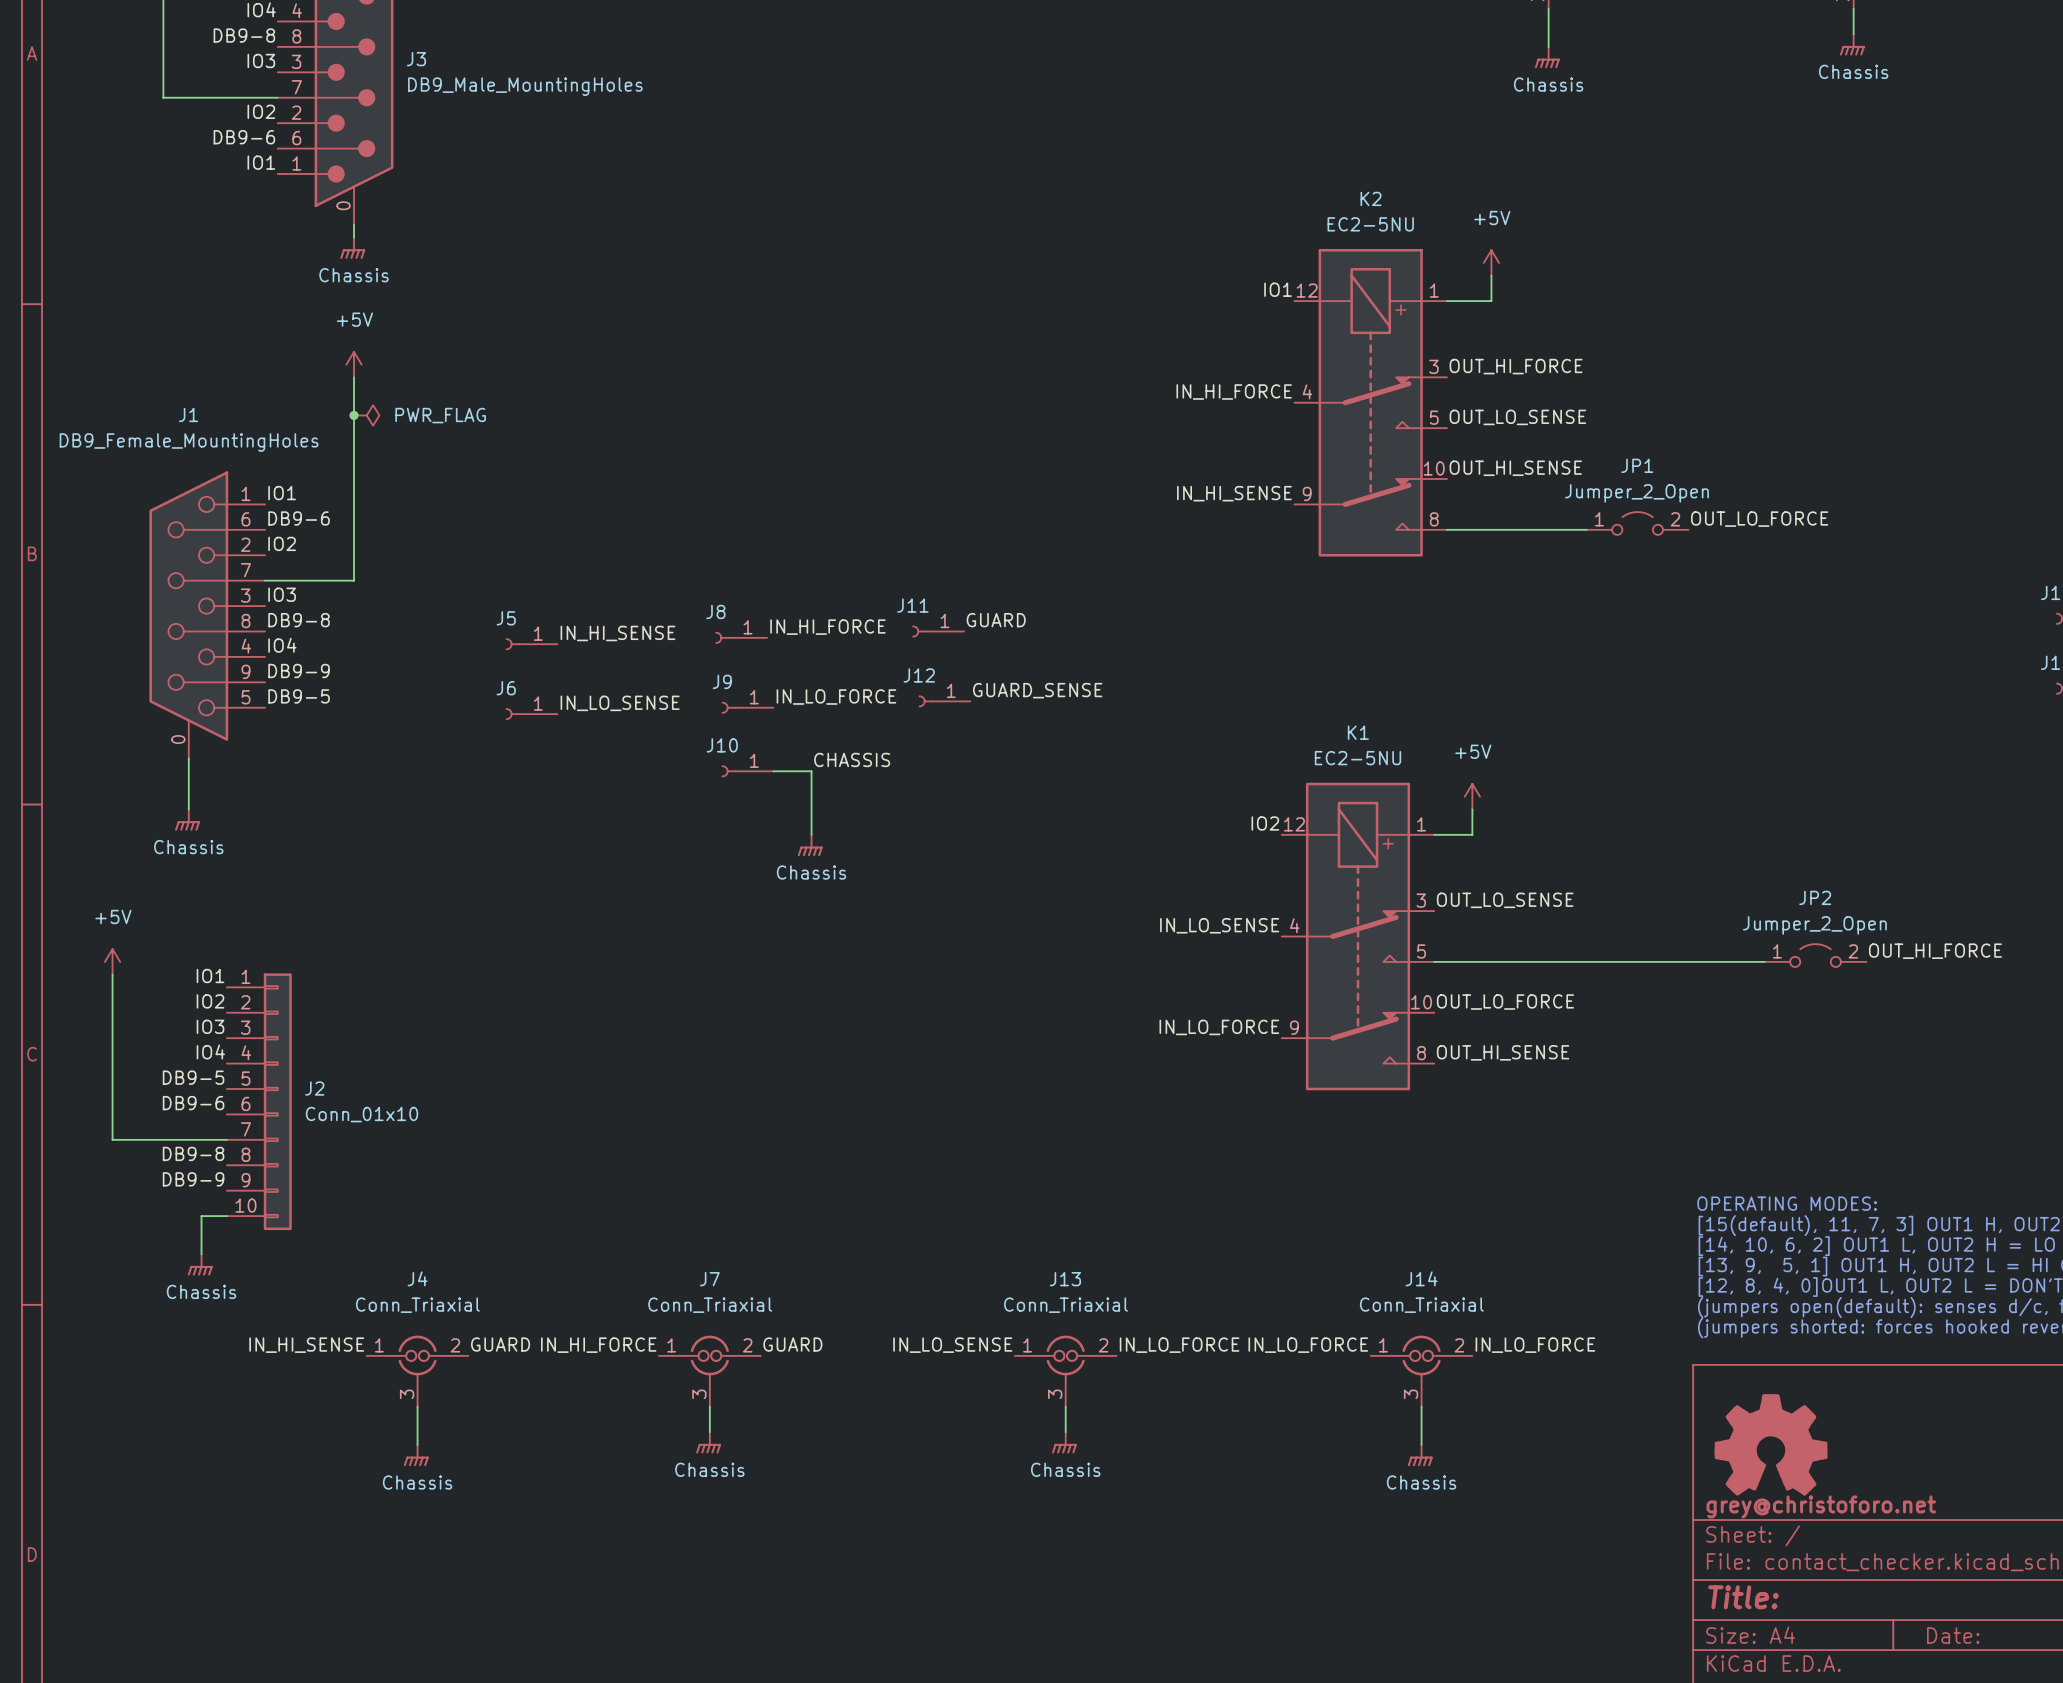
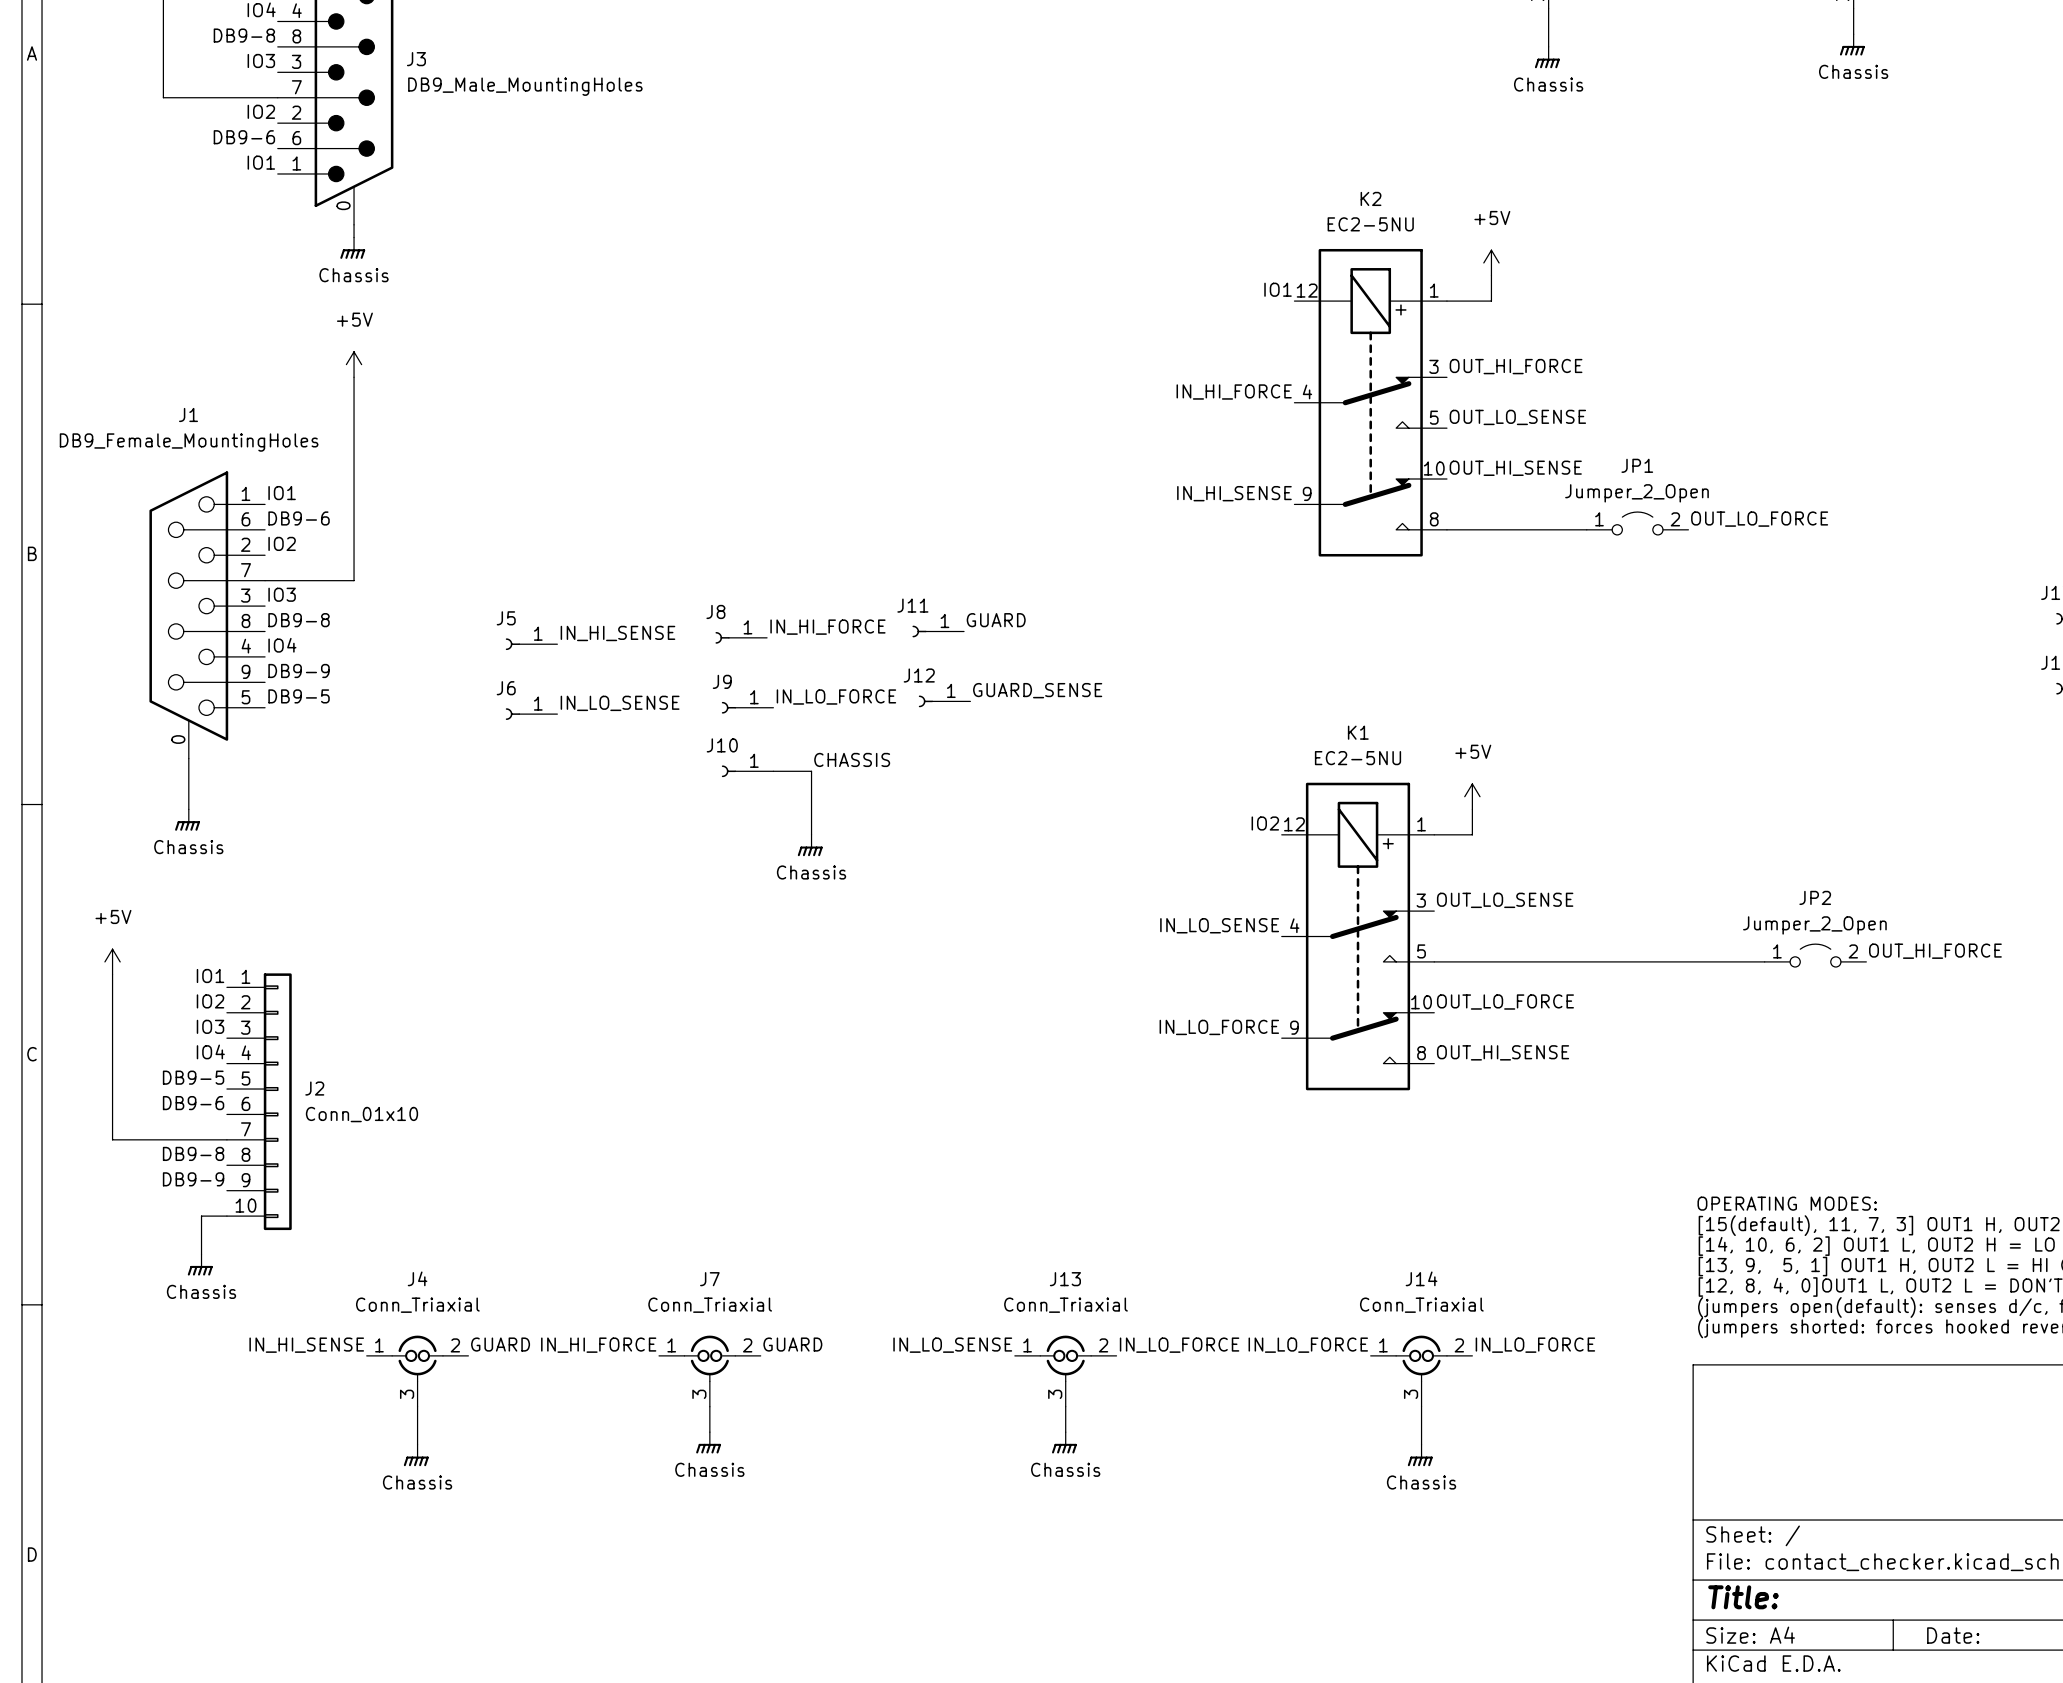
junction: (354, 415) -> none
power symbol: PWR_FLAG (366, 415) -> none
part: (1771, 1444) -> none
title block: grey@christoforo.net (1821, 1506) -> none

